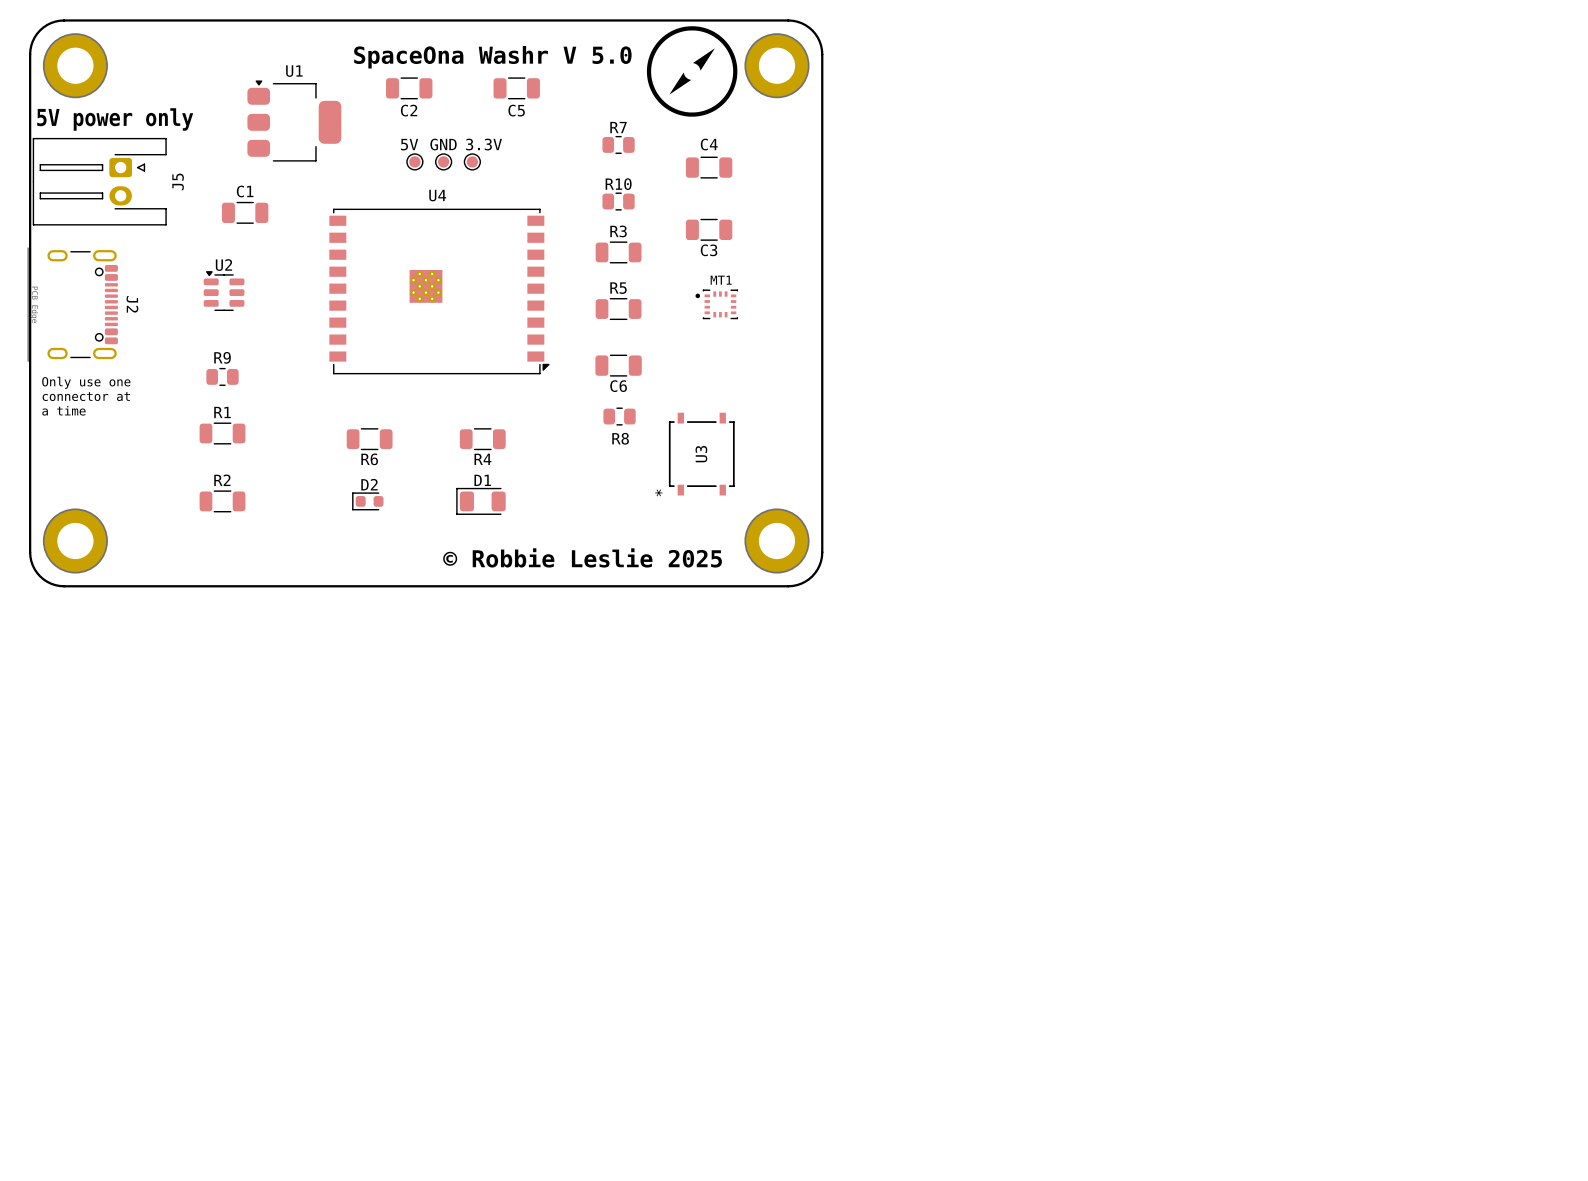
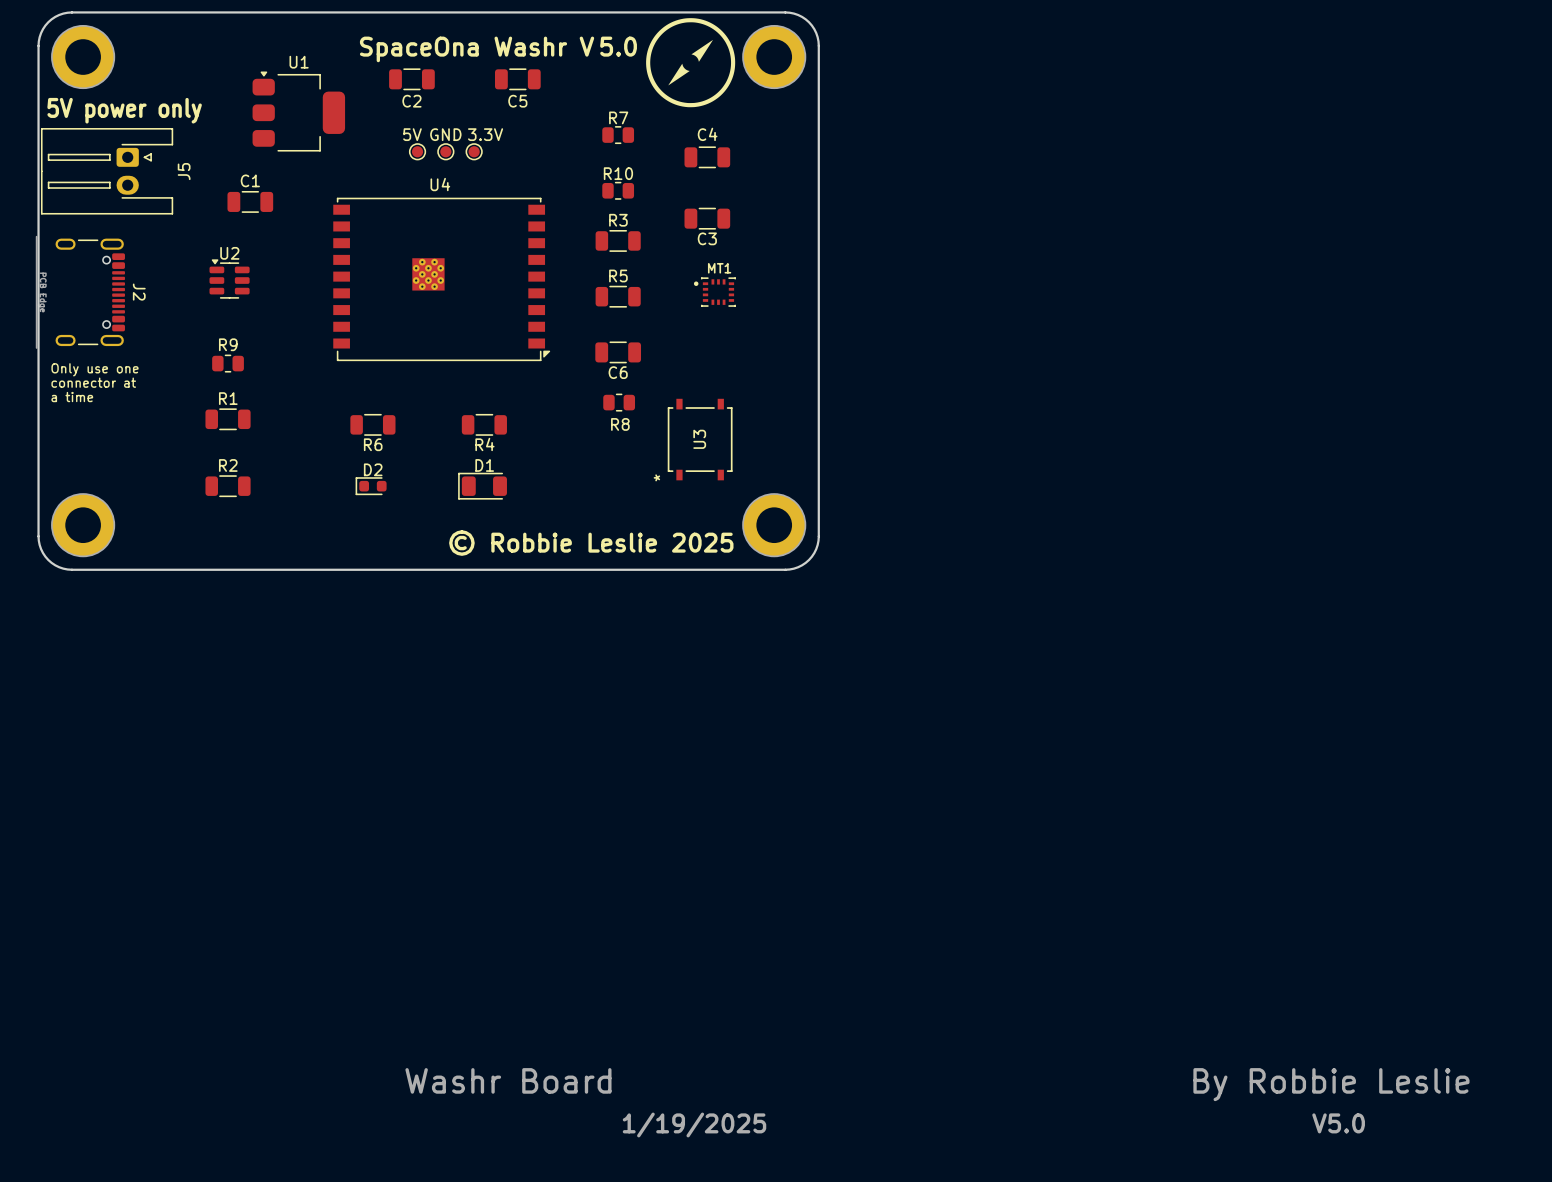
text: none -> Washr Board (508, 1080)
text: none -> By Robbie Leslie (1331, 1084)
text: none -> V5.0 (1338, 1123)
text: none -> 1/19/2025 (694, 1124)

